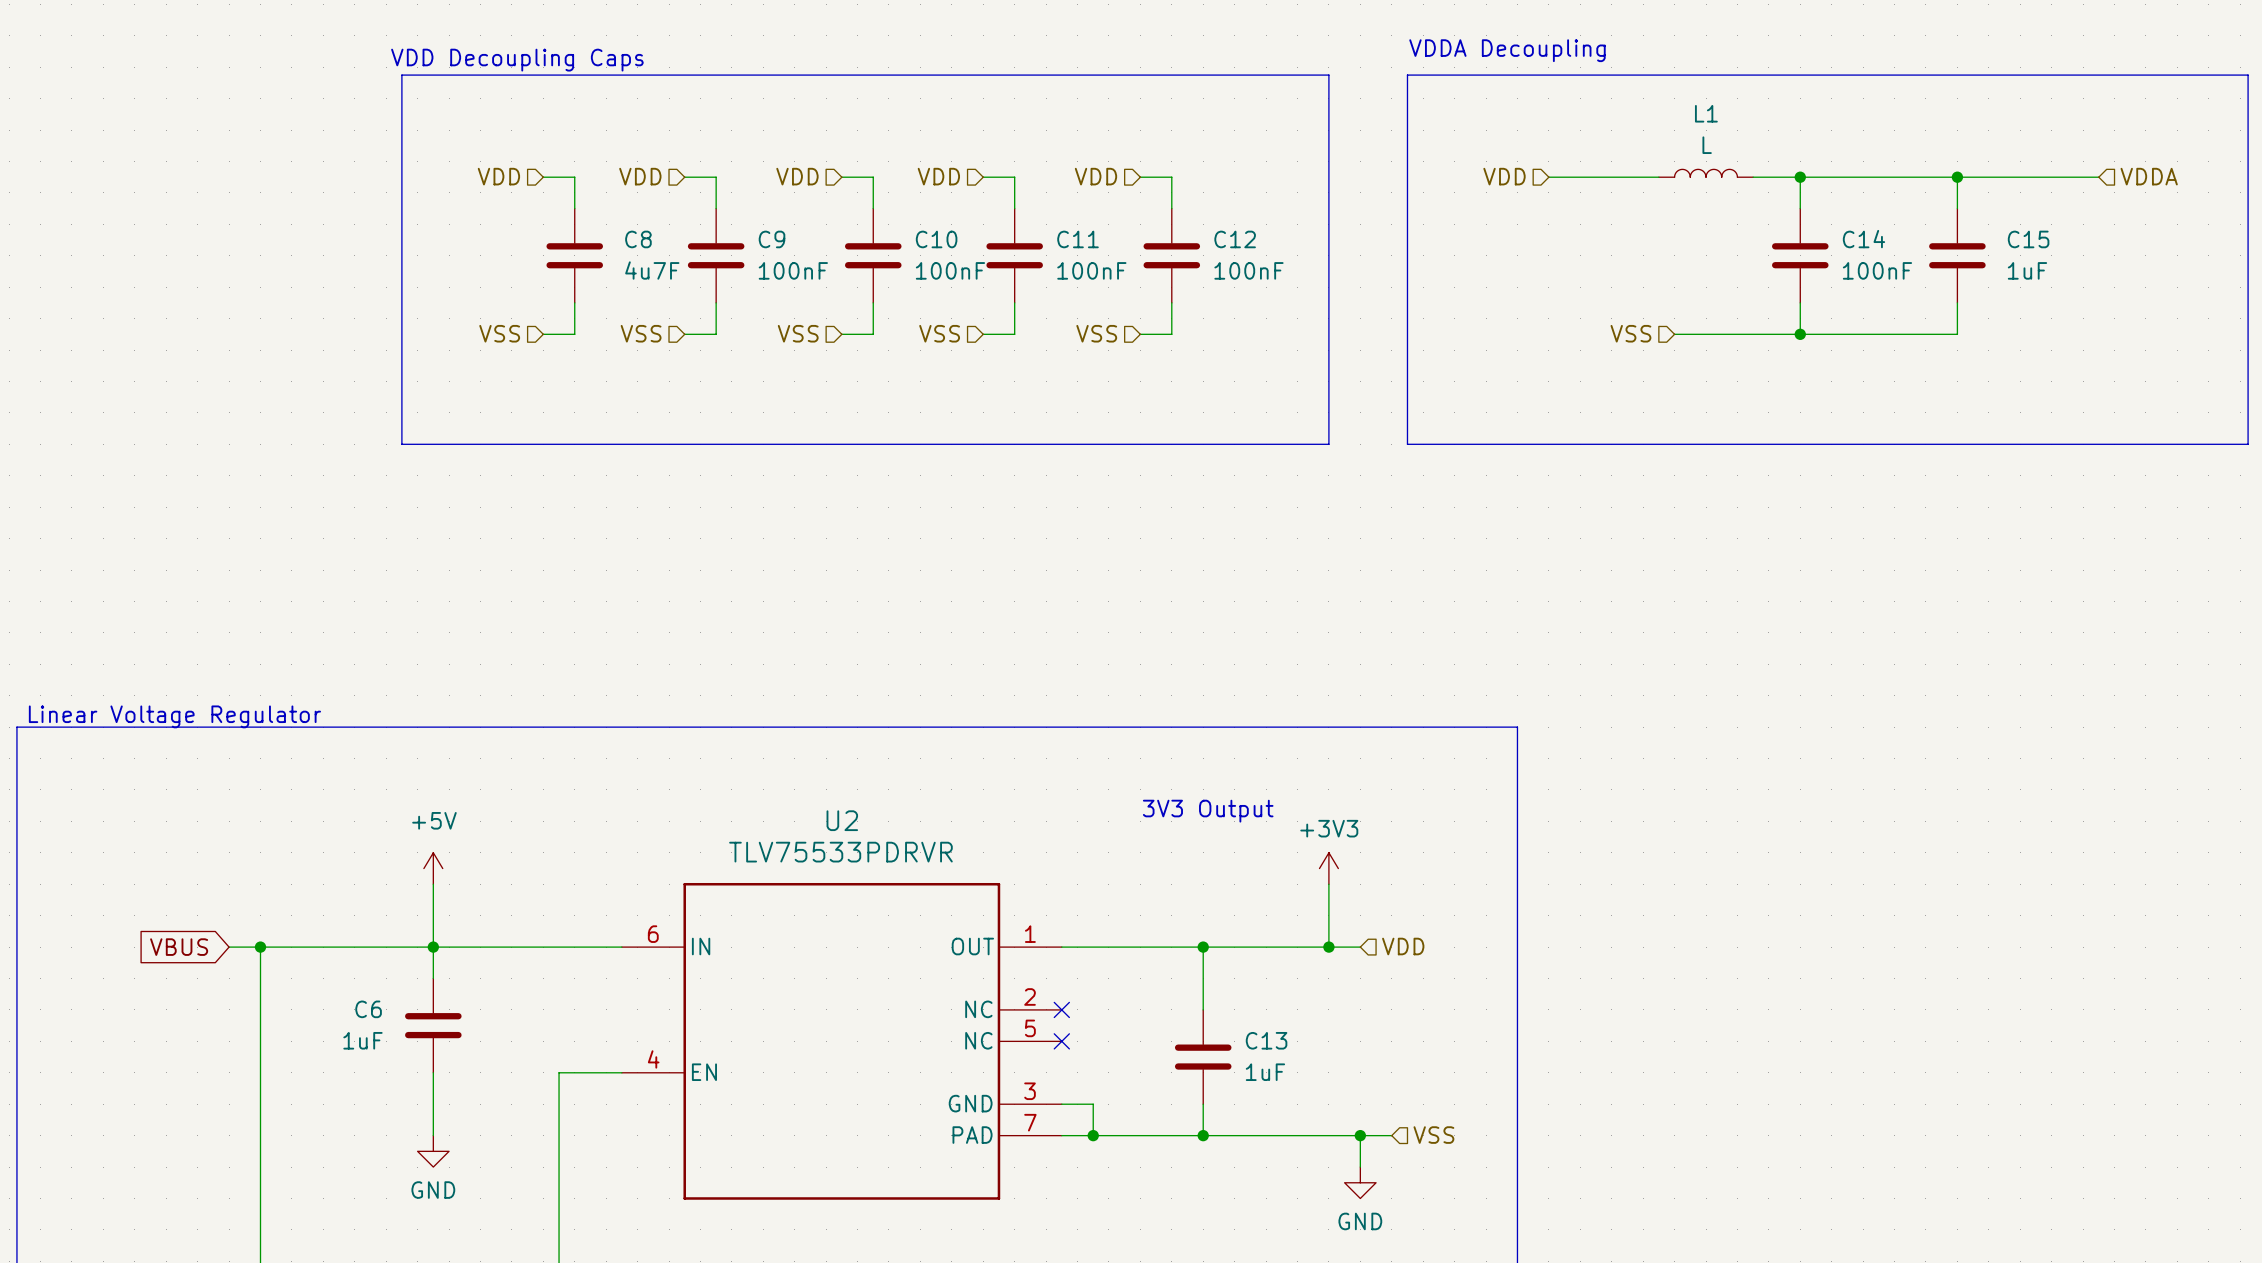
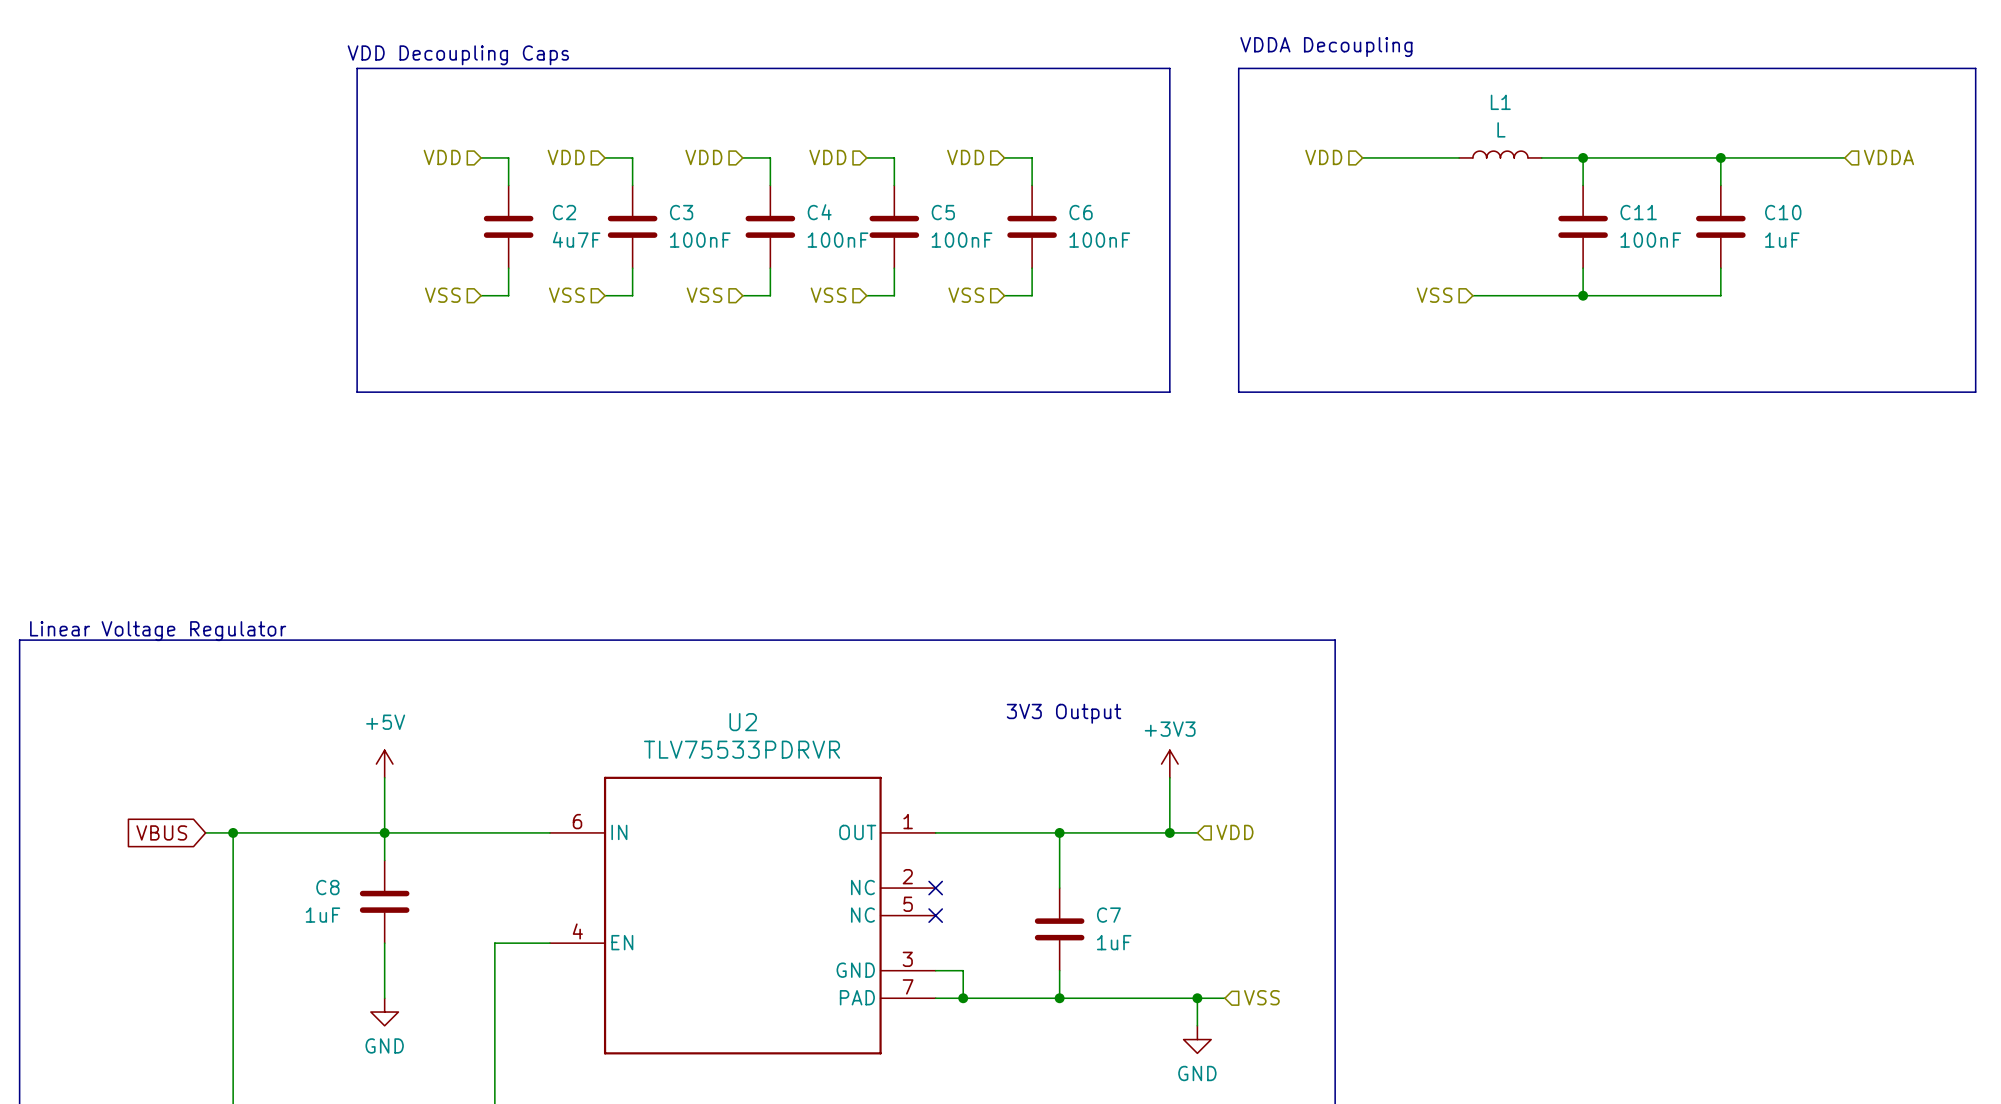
C8 name: C8 (638, 239) -> C2 (564, 212)
C9 name: C9 (772, 239) -> C3 (681, 212)
C10 name: C10 (936, 239) -> C4 (819, 212)
C11 name: C11 (1078, 239) -> C5 (943, 212)
C12 name: C12 (1235, 239) -> C6 (1081, 212)
C14 name: C14 (1863, 239) -> C11 (1638, 212)
C15 name: C15 (2028, 239) -> C10 (1783, 212)
C6 name: C6 (368, 1009) -> C8 (327, 887)
C13 name: C13 (1266, 1040) -> C7 (1108, 915)

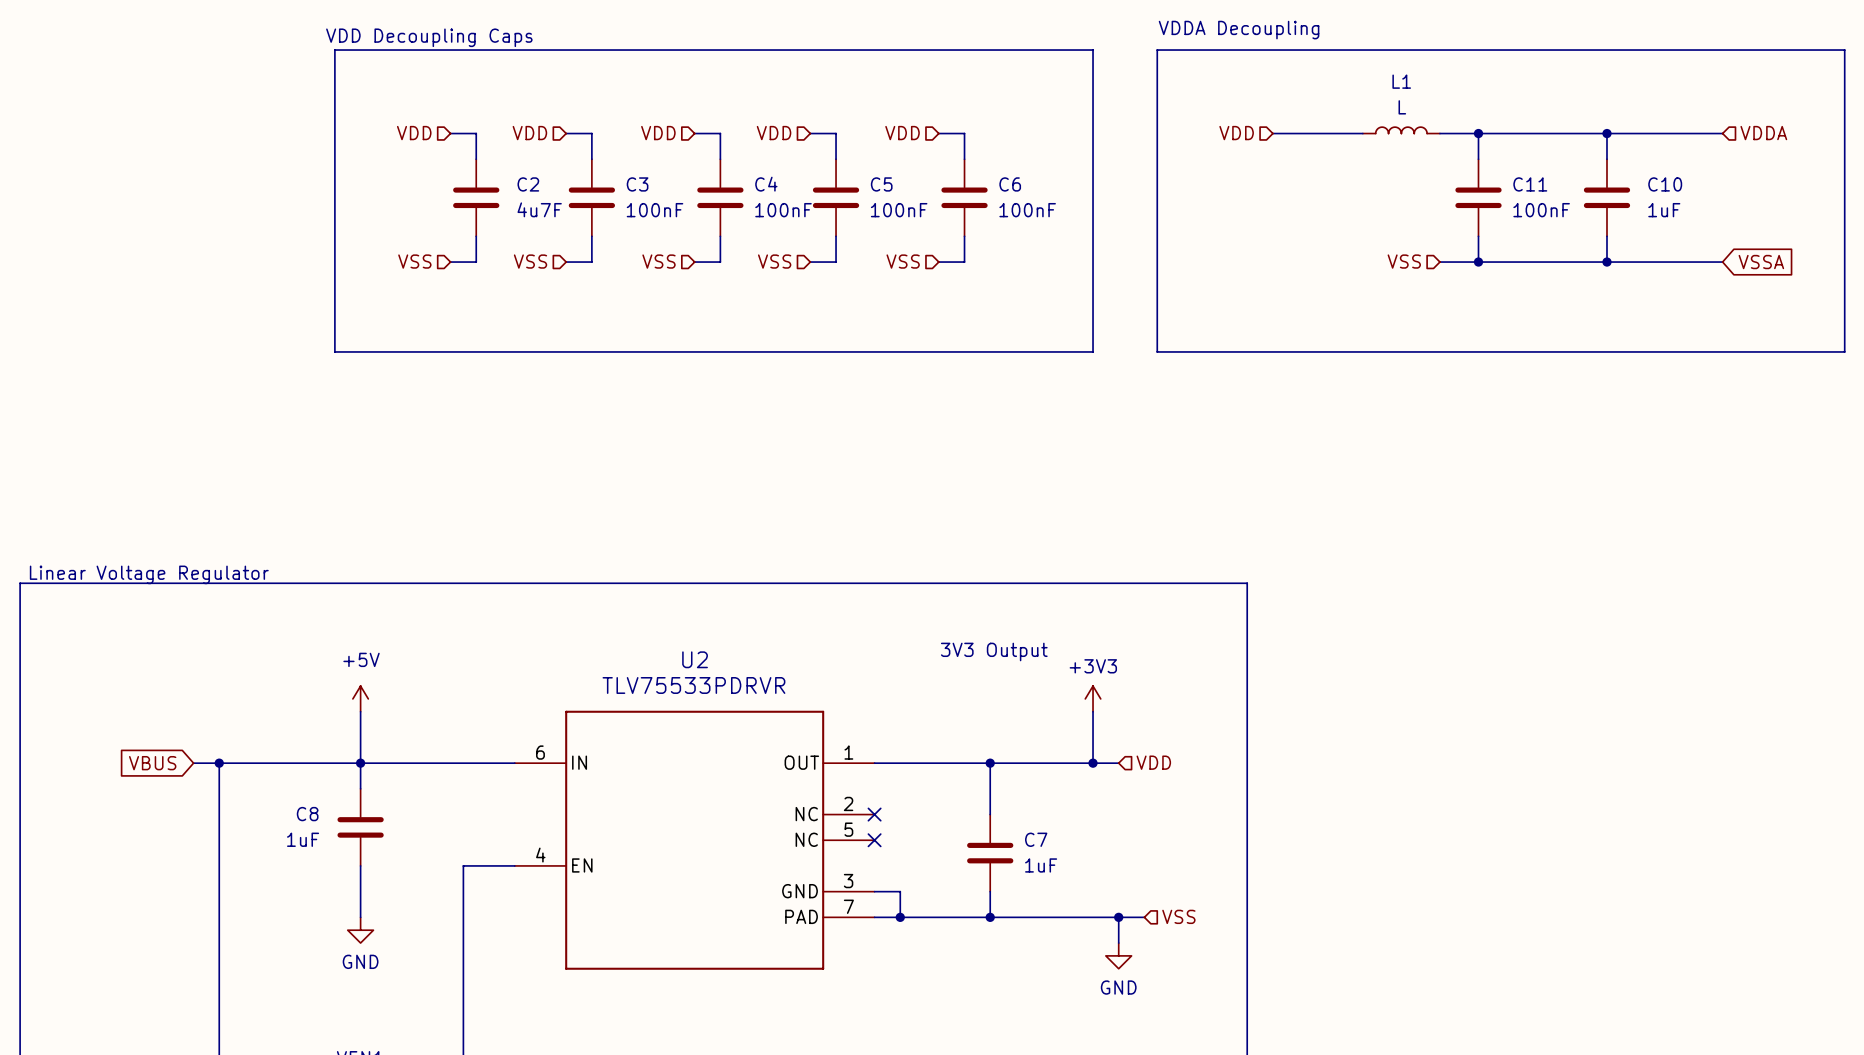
hierarchical label position: VSS (1434, 295) -> VSS (1404, 261)
wire: (1472, 295) (1541, 295) -> none
wire: none -> (1606, 262) (1722, 262)
junction: none -> (1606, 262)
global label: none -> VSSA (1761, 262)

